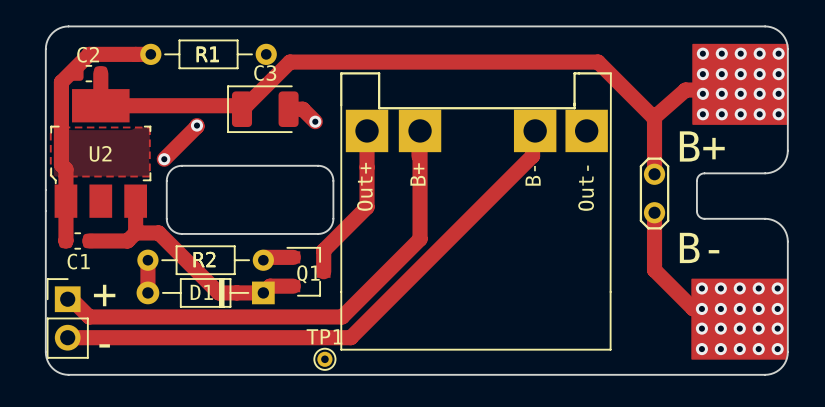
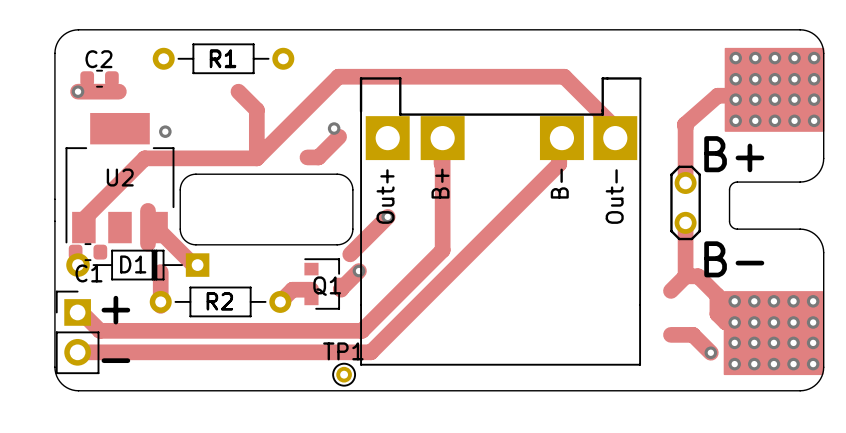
track: (150, 54) (89, 54) (61, 82) (61, 164) (65, 169) (65, 240) -> none
track: (100, 73) (100, 105) (246, 105) (289, 62) (598, 62) (653, 117) -> none
track: none -> (78, 91) (118, 91)
via: none -> (78, 91)
track: none -> (238, 91) (256, 110) (256, 158)
U2 footprint: [50, 89, 152, 218] -> [65, 112, 175, 244]
C3: (262, 109) -> none
track: (288, 109) (302, 109) (315, 121) -> none
track: none -> (615, 127) (564, 76) (338, 76) (256, 158)
via: none -> (165, 131)
track: (196, 125) (164, 159) -> none
via: (196, 125) -> none
zone outline: (50, 127) (50, 176) (149, 176) (149, 127) (50, 127) -> none
track: none -> (339, 136) (318, 157) (307, 157)
track: (367, 130) (367, 207) (323, 250) (323, 271) -> none
track: none -> (256, 158) (144, 158) (83, 219) (83, 230)
via: (164, 159) -> none
via: none -> (387, 216)
track: none -> (156, 227) (193, 265) (197, 265)
track: (89, 240) (127, 240) (135, 232) (158, 232) (218, 292) (263, 292) (270, 286) (293, 286) -> none
track: (293, 257) (266, 257) (263, 260) -> none
text position: R2 (204, 259) -> R2 (219, 301)
track: none -> (358, 271) (341, 289)
via: none -> (358, 271)
R2 position: (205, 260) -> (220, 301)
track: (654, 264) (654, 270) (685, 300) -> (670, 290) (685, 276) (698, 276) (717, 295) (717, 314)
track: none -> (311, 289) (292, 289) (280, 301)
text position: D1 (201, 292) -> D1 (133, 264)
part position: (205, 292) -> (137, 265)
track: none -> (670, 334) (692, 334) (710, 352)
via: none -> (710, 352)

